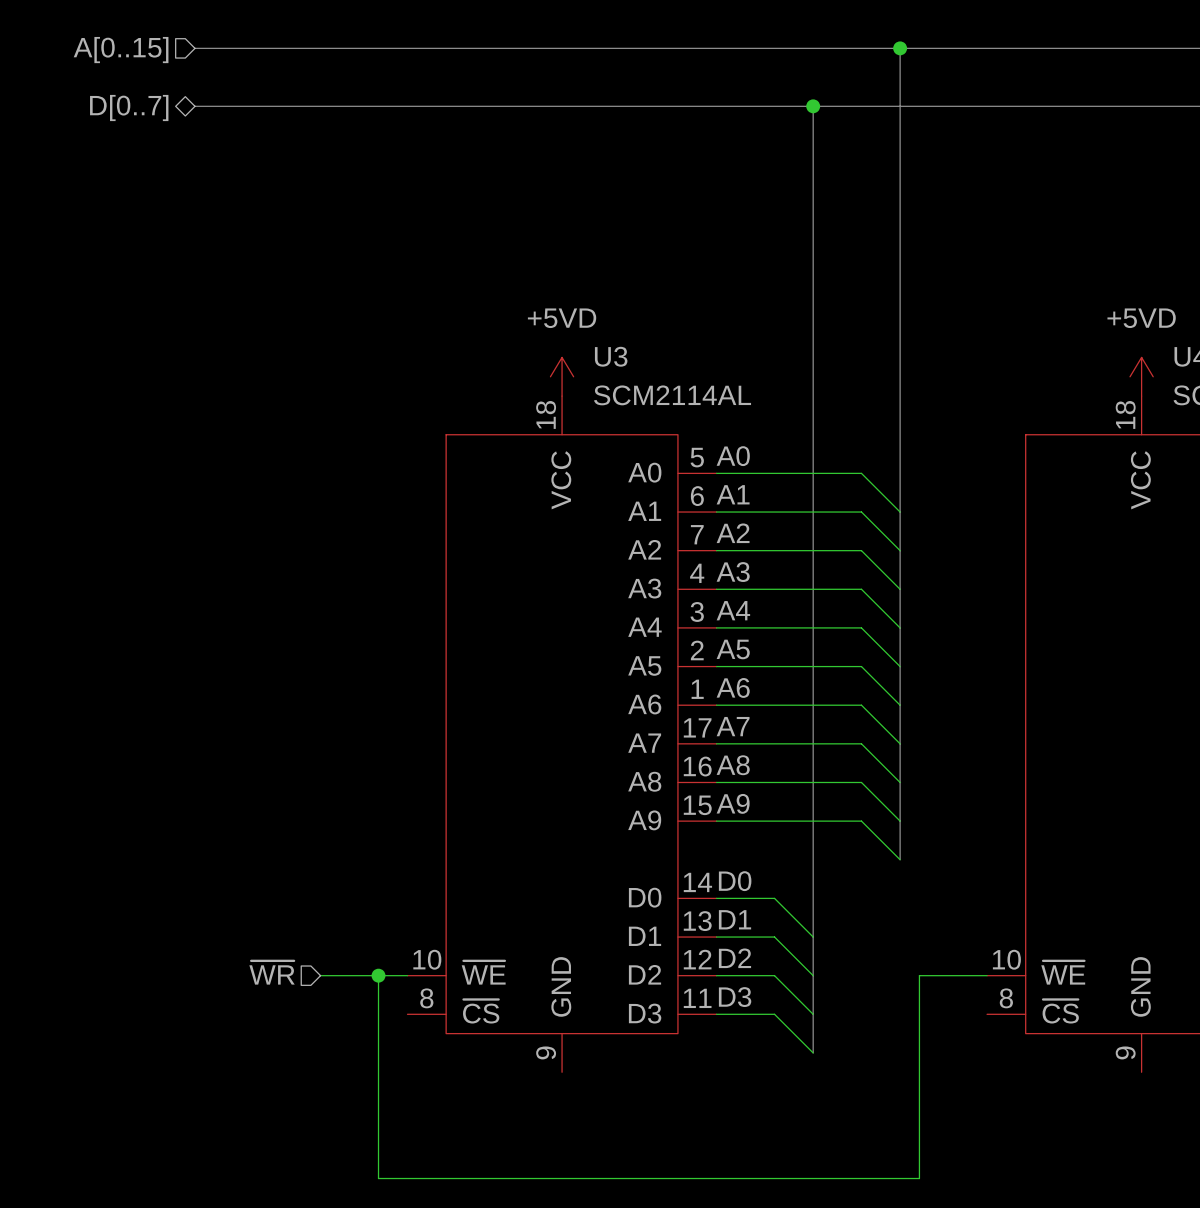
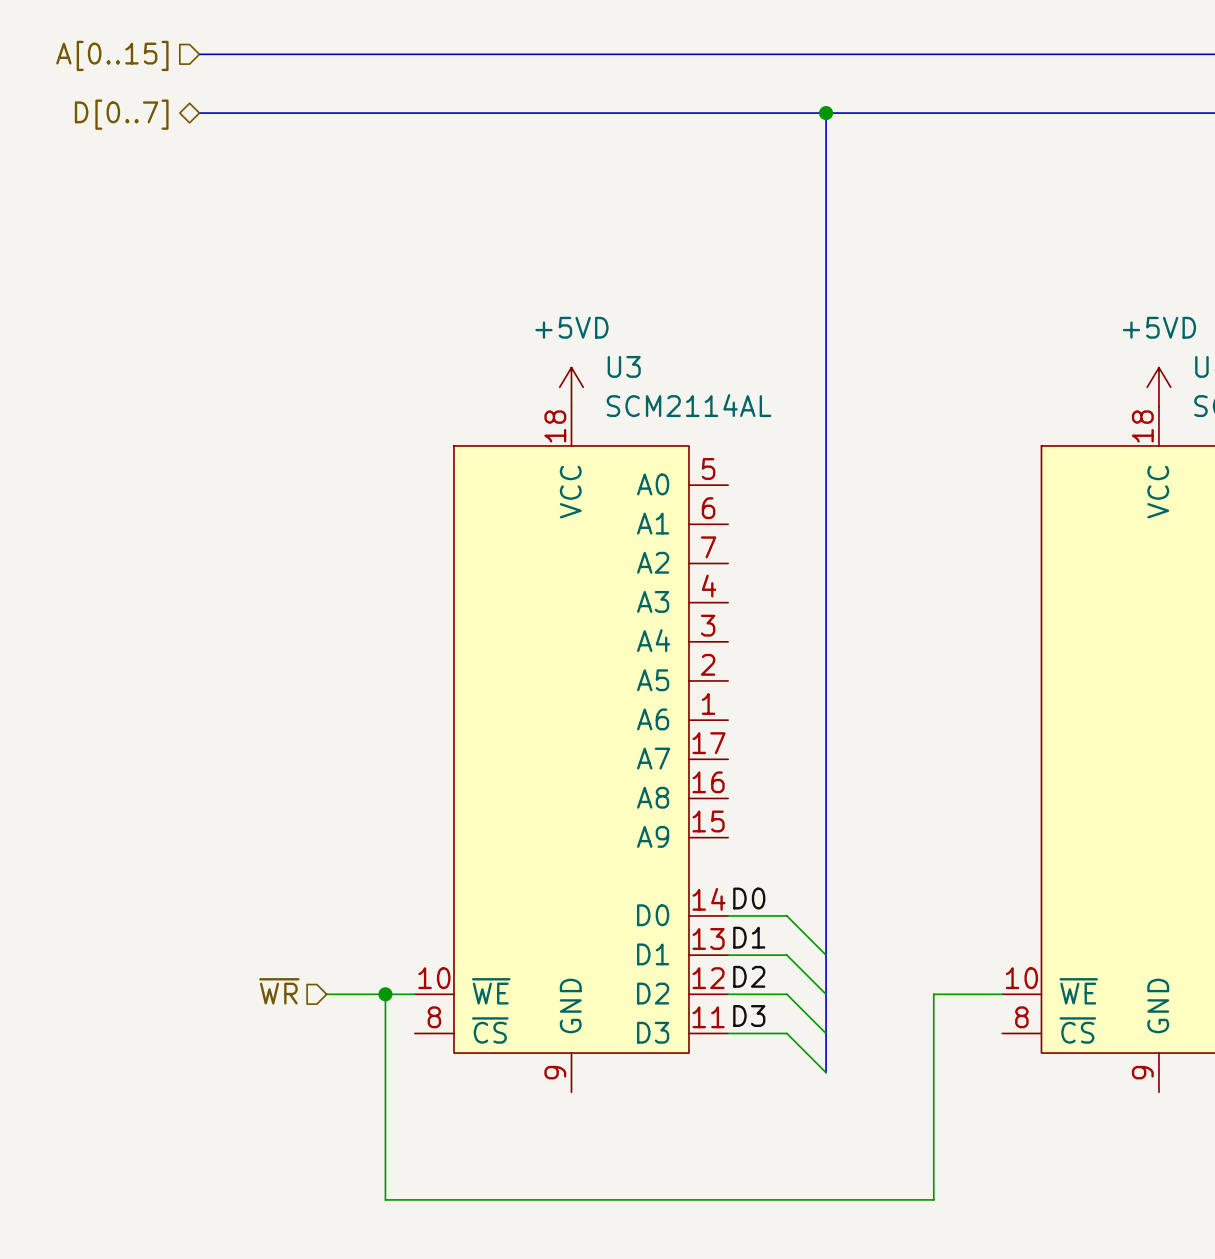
bus: (900, 48) (900, 859) -> none
junction: (900, 48) -> none
label: A0 (733, 456) -> none
wire: (716, 473) (861, 473) (900, 512) -> none
label: A1 (733, 494) -> none
wire: (716, 512) (861, 512) (900, 550) -> none
label: A2 (733, 533) -> none
wire: (716, 550) (861, 550) (900, 589) -> none
label: A3 (733, 572) -> none
wire: (716, 589) (861, 589) (900, 627) -> none
label: A4 (733, 610) -> none
wire: (716, 627) (861, 627) (900, 666) -> none
label: A5 (733, 649) -> none
wire: (716, 666) (861, 666) (900, 705) -> none
label: A6 (733, 687) -> none
wire: (716, 705) (861, 705) (900, 743) -> none
label: A7 (733, 726) -> none
wire: (716, 743) (861, 743) (900, 782) -> none
label: A8 (733, 765) -> none
wire: (716, 782) (861, 782) (900, 821) -> none
label: A9 (733, 803) -> none
wire: (716, 821) (861, 821) (900, 859) -> none

